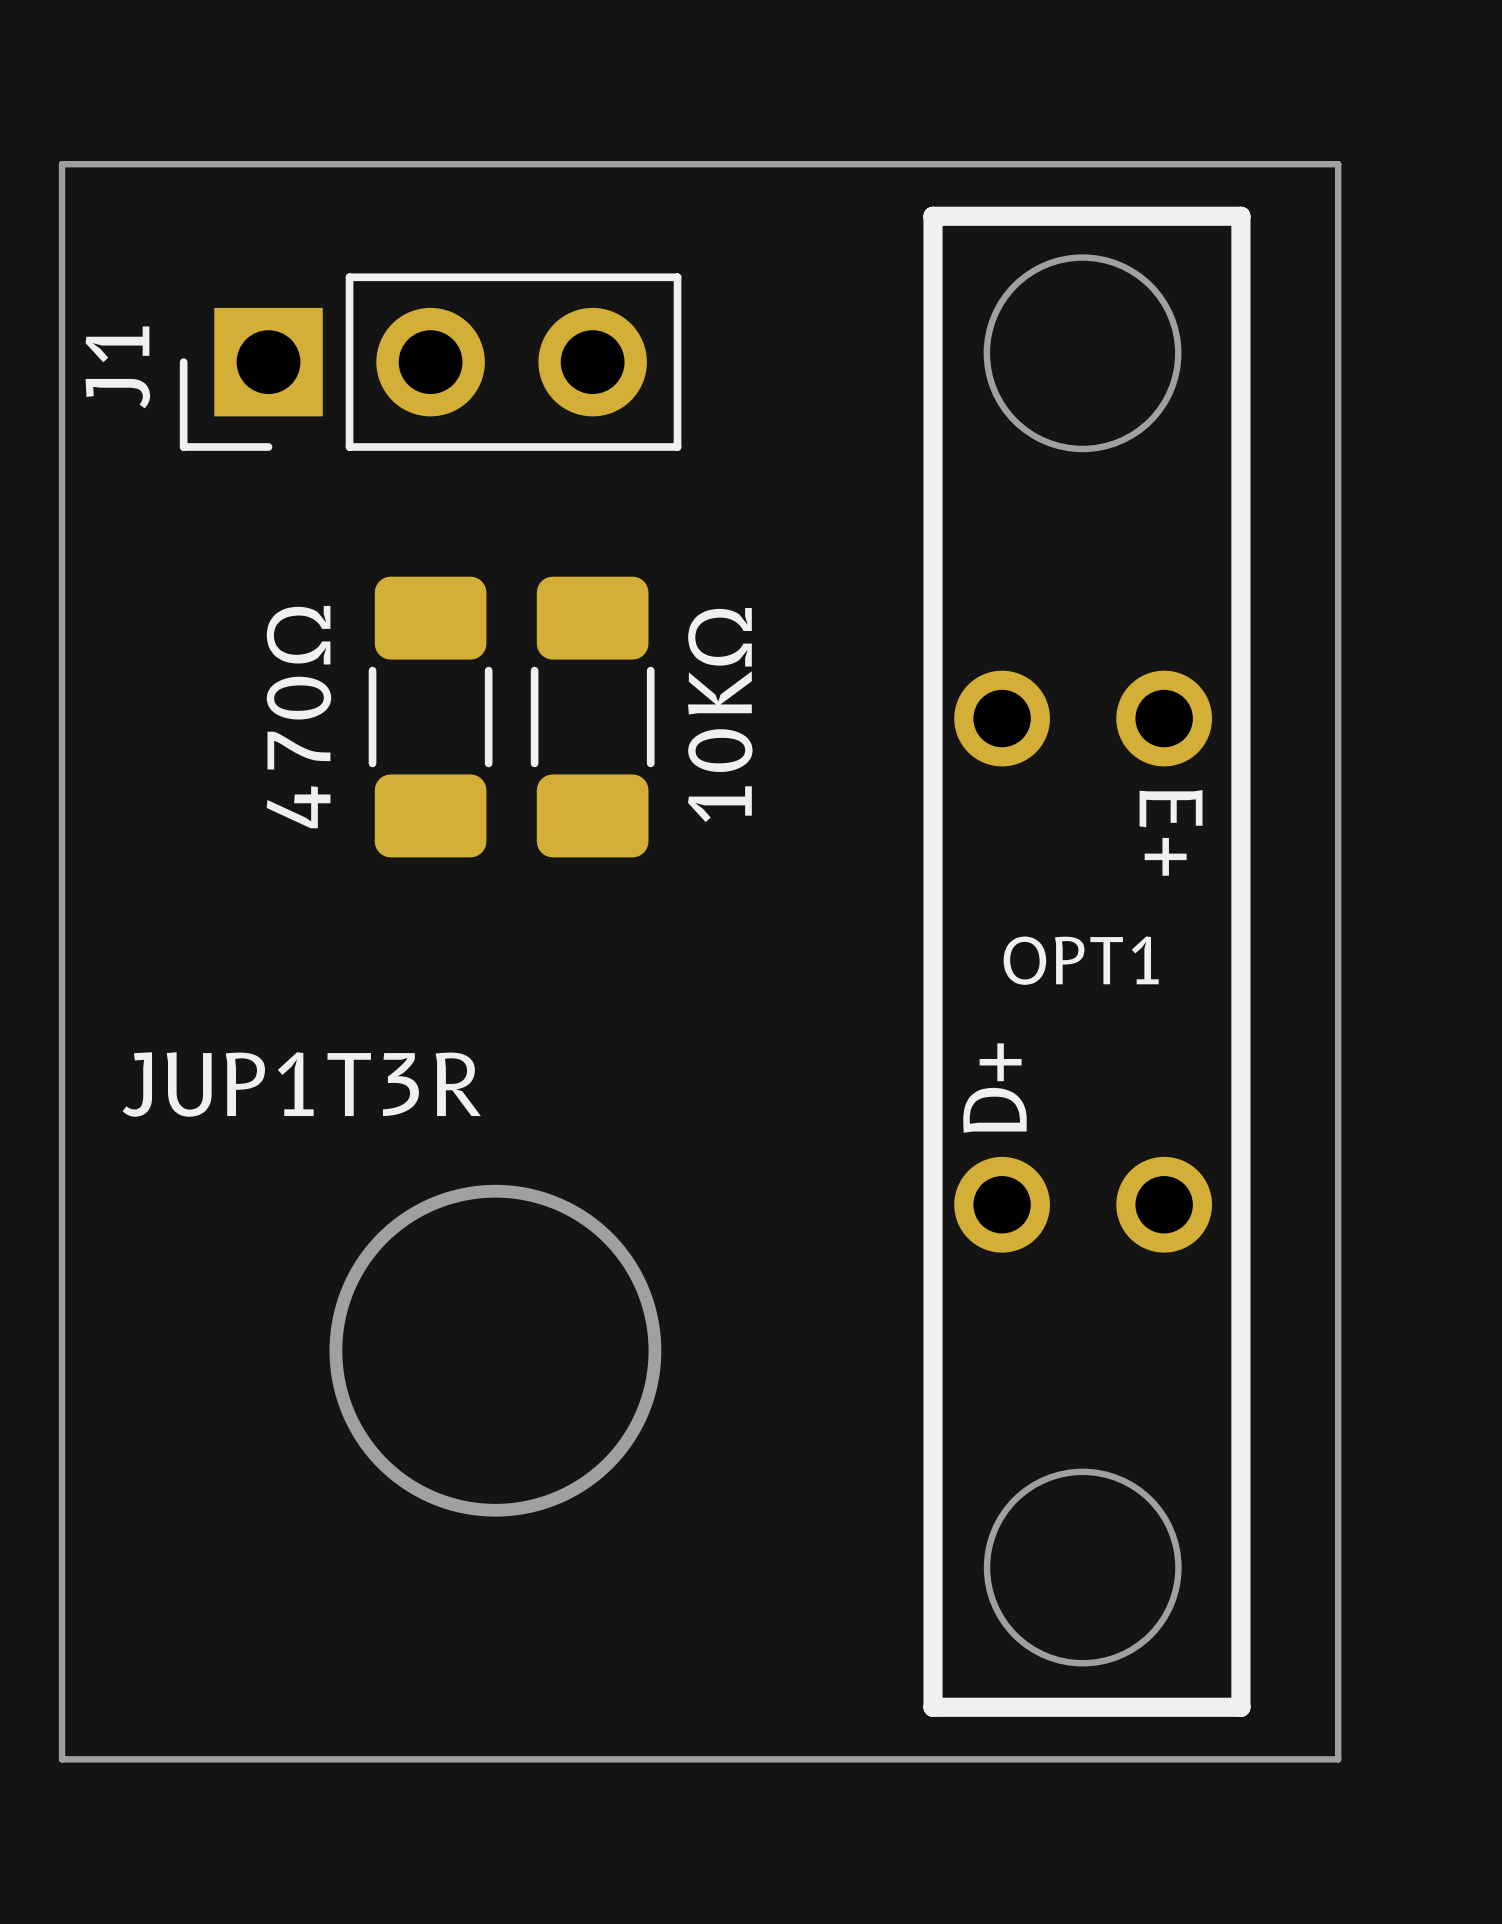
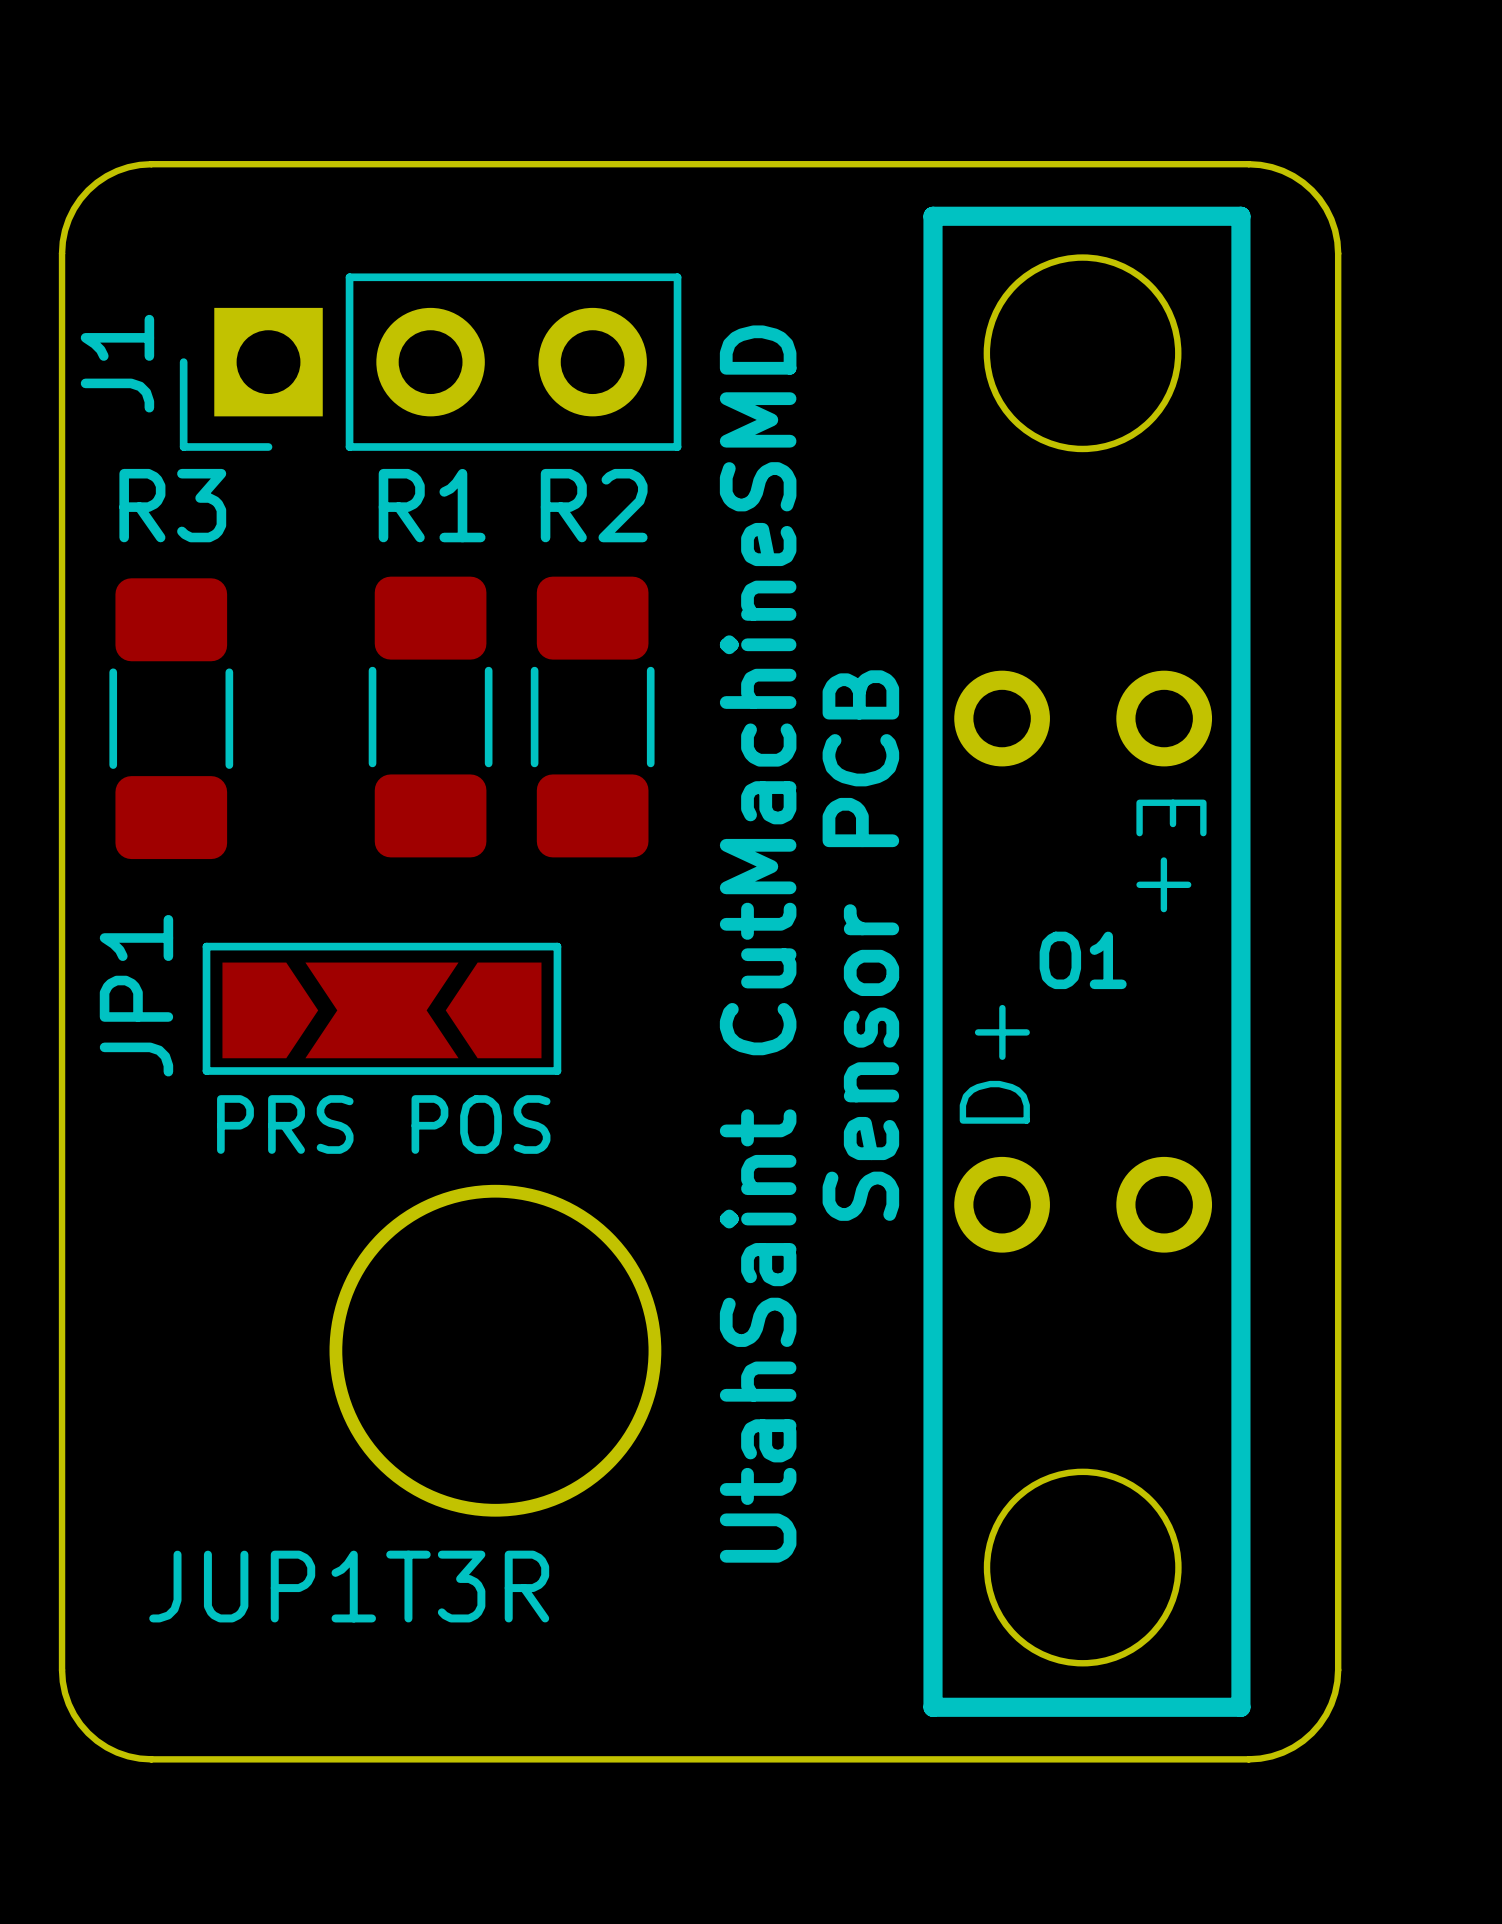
board edge: (151, 164) (62, 164) (62, 253) -> (151, 164) (128, 167) (117, 171) (106, 176) (88, 190) (80, 199) (68, 219) (62, 241) (62, 253)
board edge: (1248, 164) (1338, 164) (1338, 253) -> (1248, 164) (1260, 164) (1283, 171) (1293, 176) (1312, 190) (1319, 199) (1331, 219) (1337, 241) (1338, 253)
10KΩ name: 10KΩ (720, 715) -> R2 (594, 505)
470Ω name: 470Ω (298, 717) -> R1 (432, 505)
R3: none -> (171, 718)
text: none -> UtahSaint CutMachineSMD (758, 944)
text: none -> Sensor PCB (860, 945)
OPT1 name: OPT1 (1081, 960) -> O1 (1083, 960)
JP1: none -> (381, 1008)
text position: JUP1T3R (301, 1084) -> JUP1T3R (349, 1586)
text: none -> PRS (285, 1124)
text: none -> POS (480, 1124)
board edge: (62, 1670) (62, 1759) (151, 1759) -> (62, 1670) (65, 1693) (68, 1704) (80, 1724) (88, 1733) (96, 1740) (117, 1752) (128, 1756) (151, 1759)
board edge: (1338, 1670) (1338, 1759) (1248, 1759) -> (1338, 1670) (1335, 1693) (1331, 1704) (1326, 1714) (1312, 1733) (1303, 1740) (1283, 1752) (1260, 1758) (1248, 1759)

